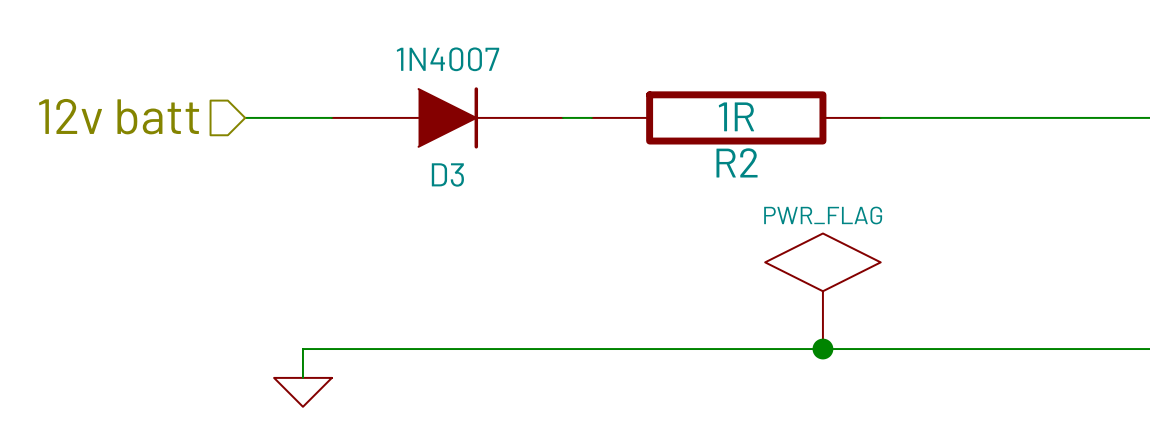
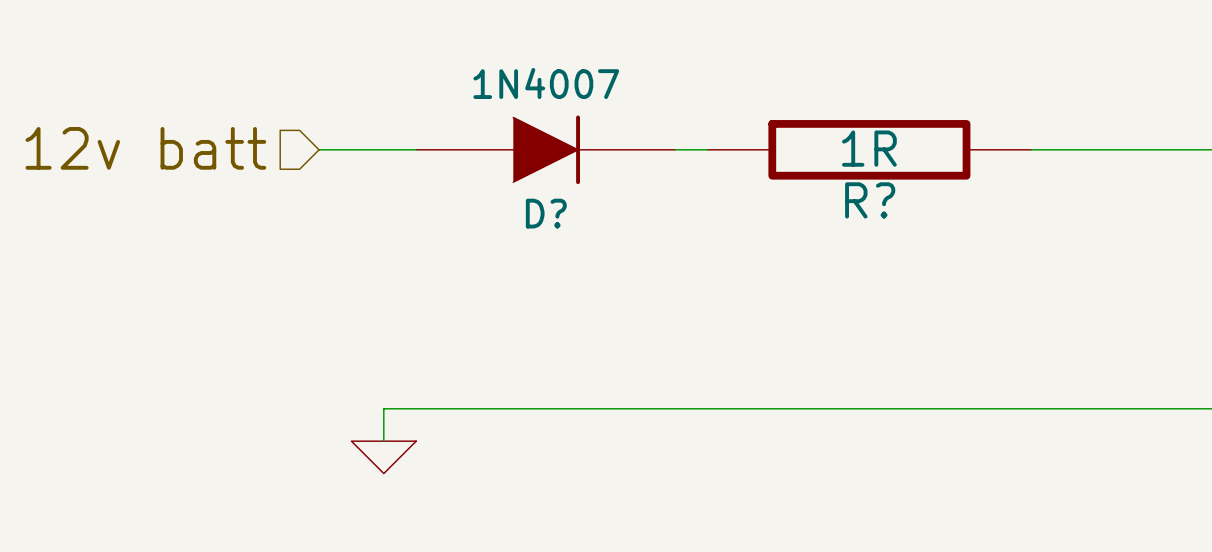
R2 name: R2 (737, 162) -> R? (870, 200)
D3 name: D3 (447, 174) -> D? (546, 213)
power symbol: PWR_FLAG (822, 291) -> none
junction: (822, 349) -> none

